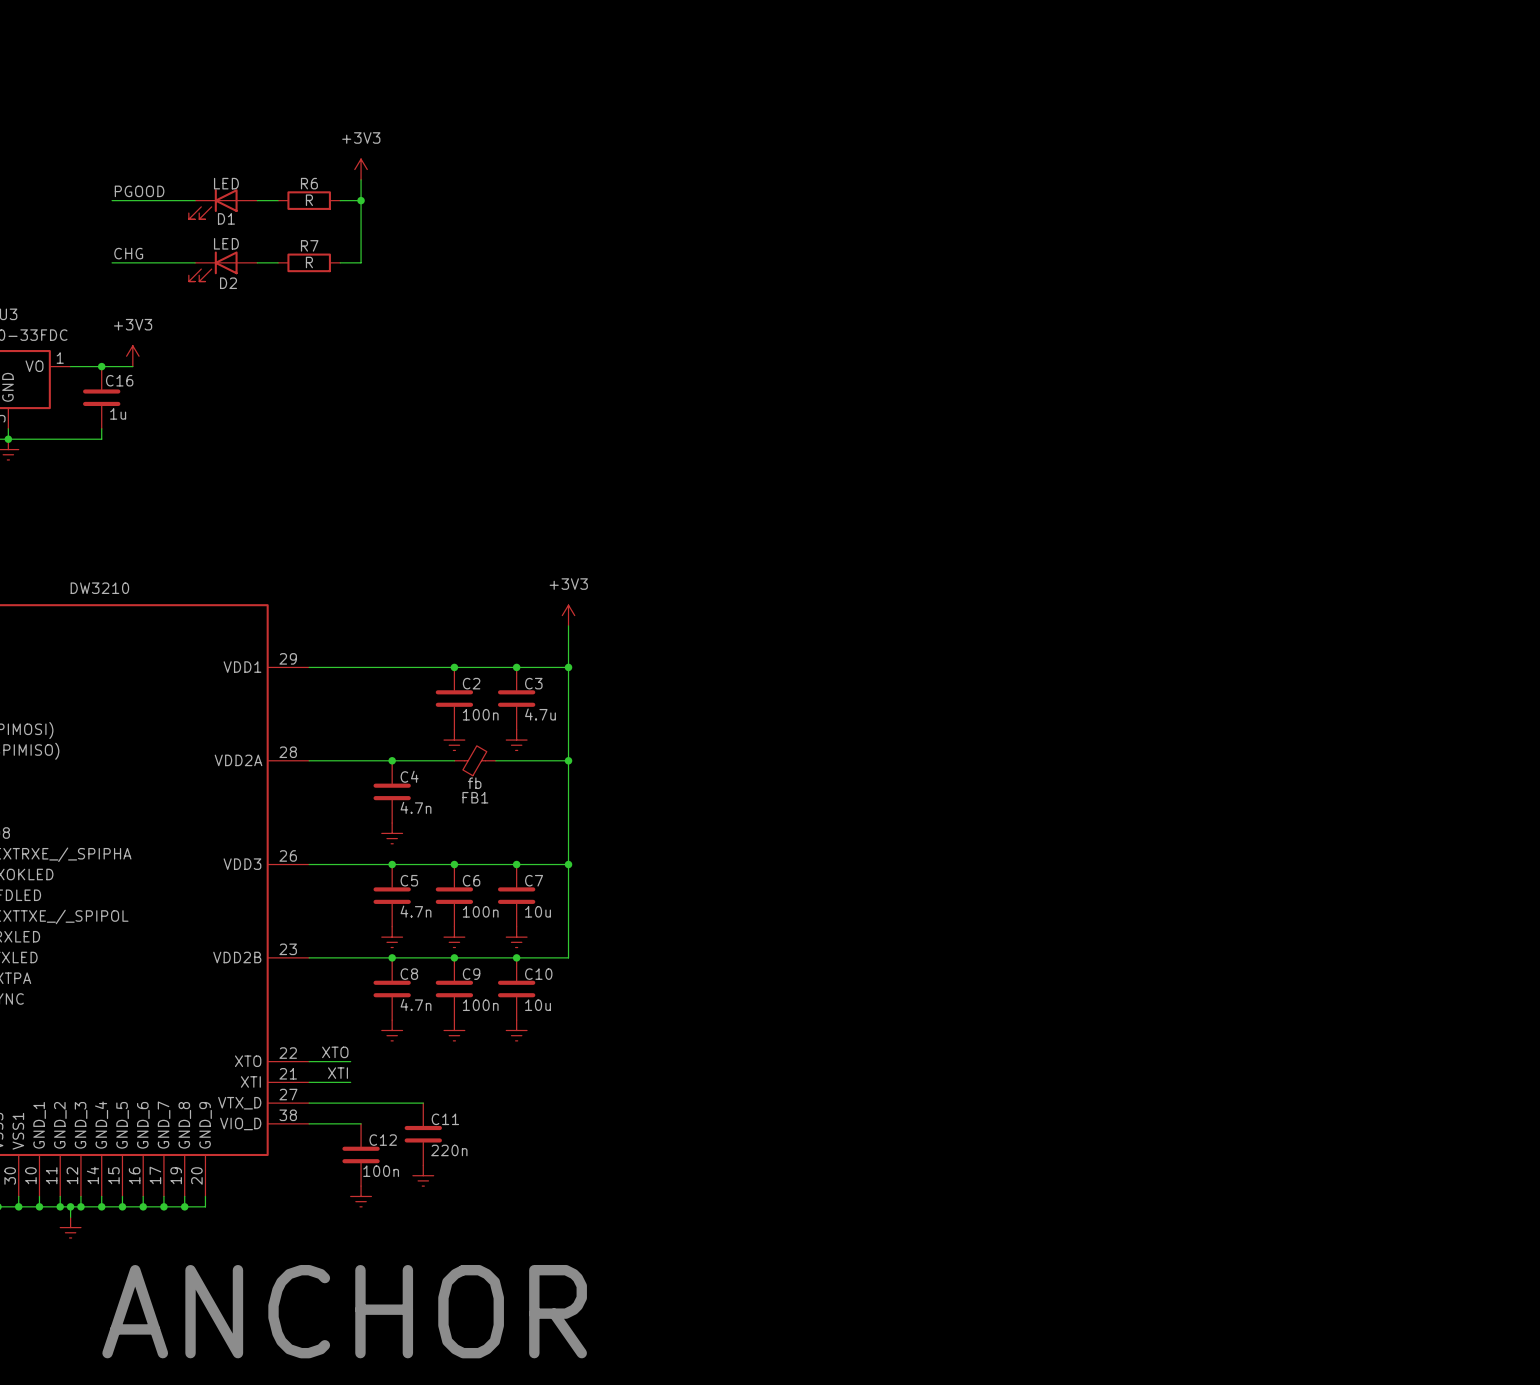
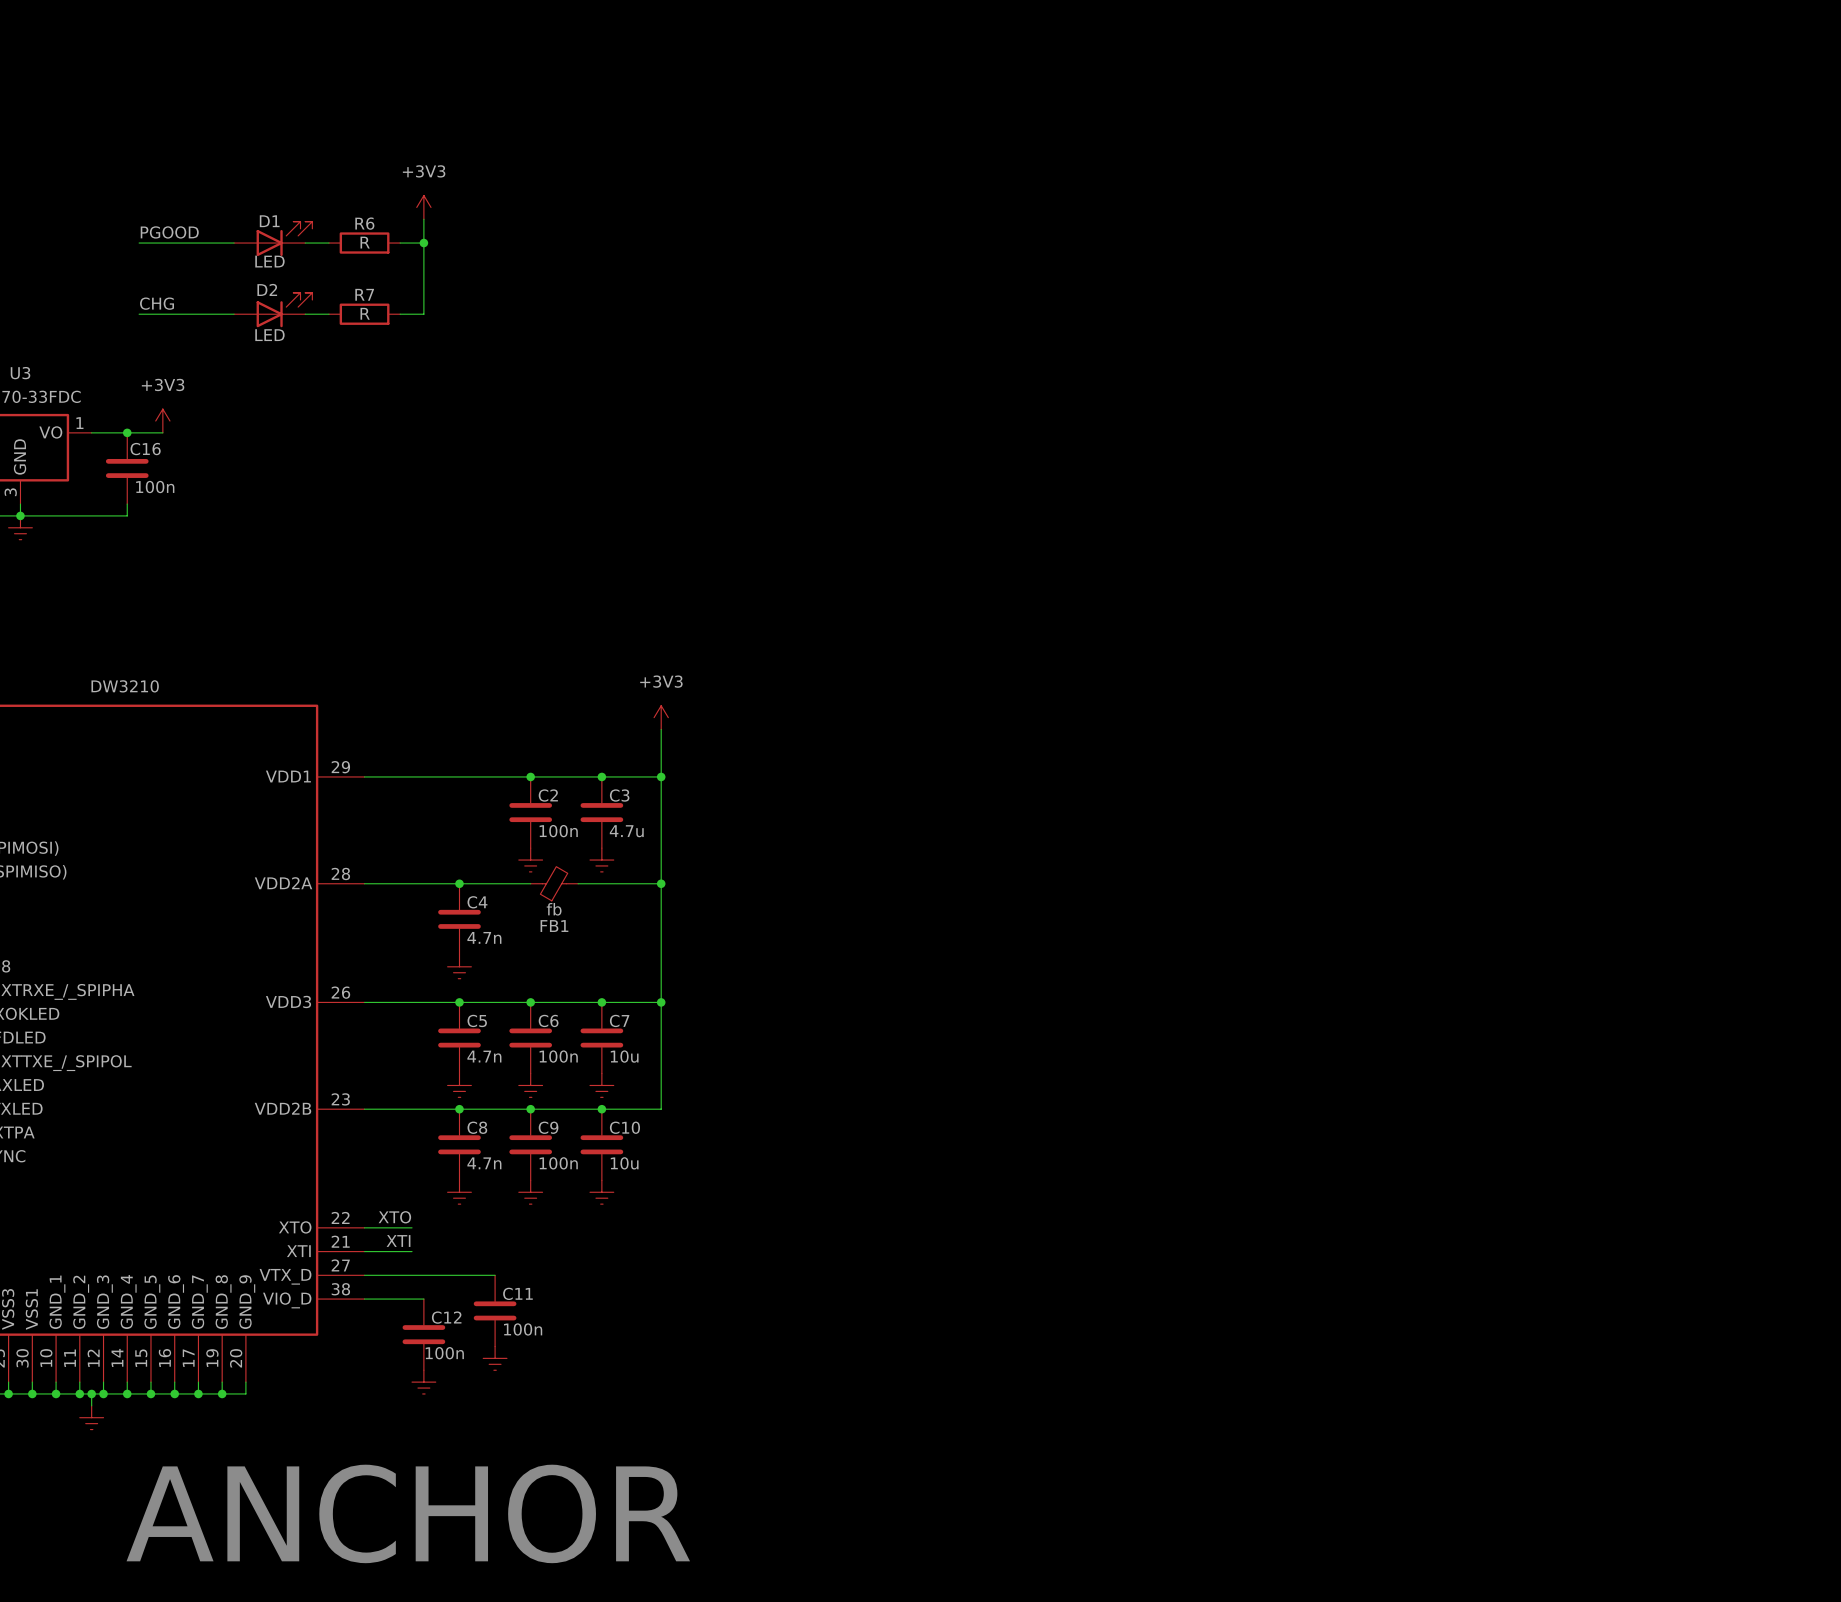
D1 rotation: 0° (213, 204) -> 180° (284, 238)
D2 rotation: 0° (213, 266) -> 180° (284, 310)
C16 value: 1u (118, 413) -> 100n (155, 487)
C11 value: 220n (449, 1150) -> 100n (523, 1329)

